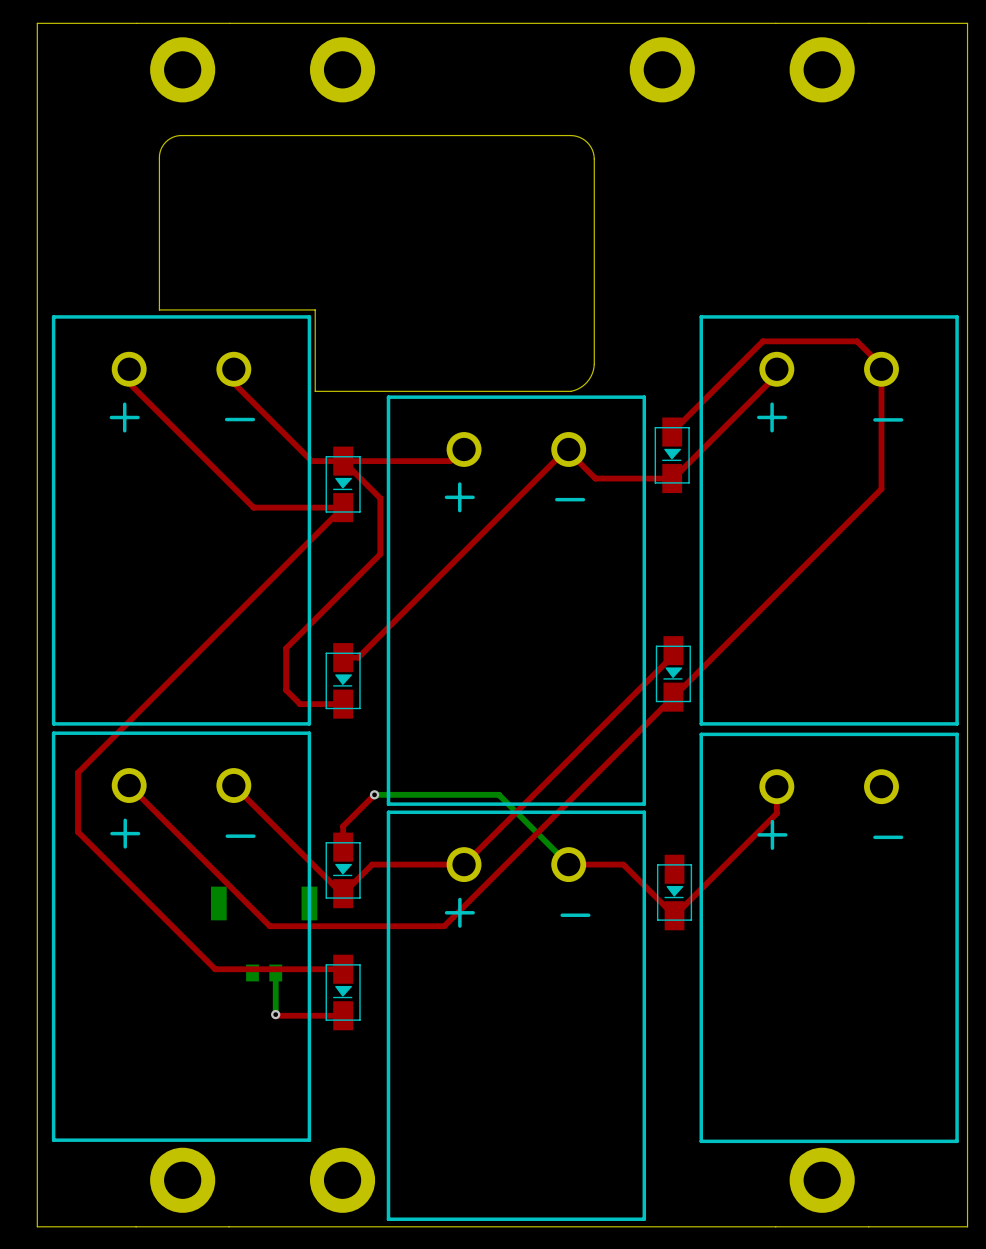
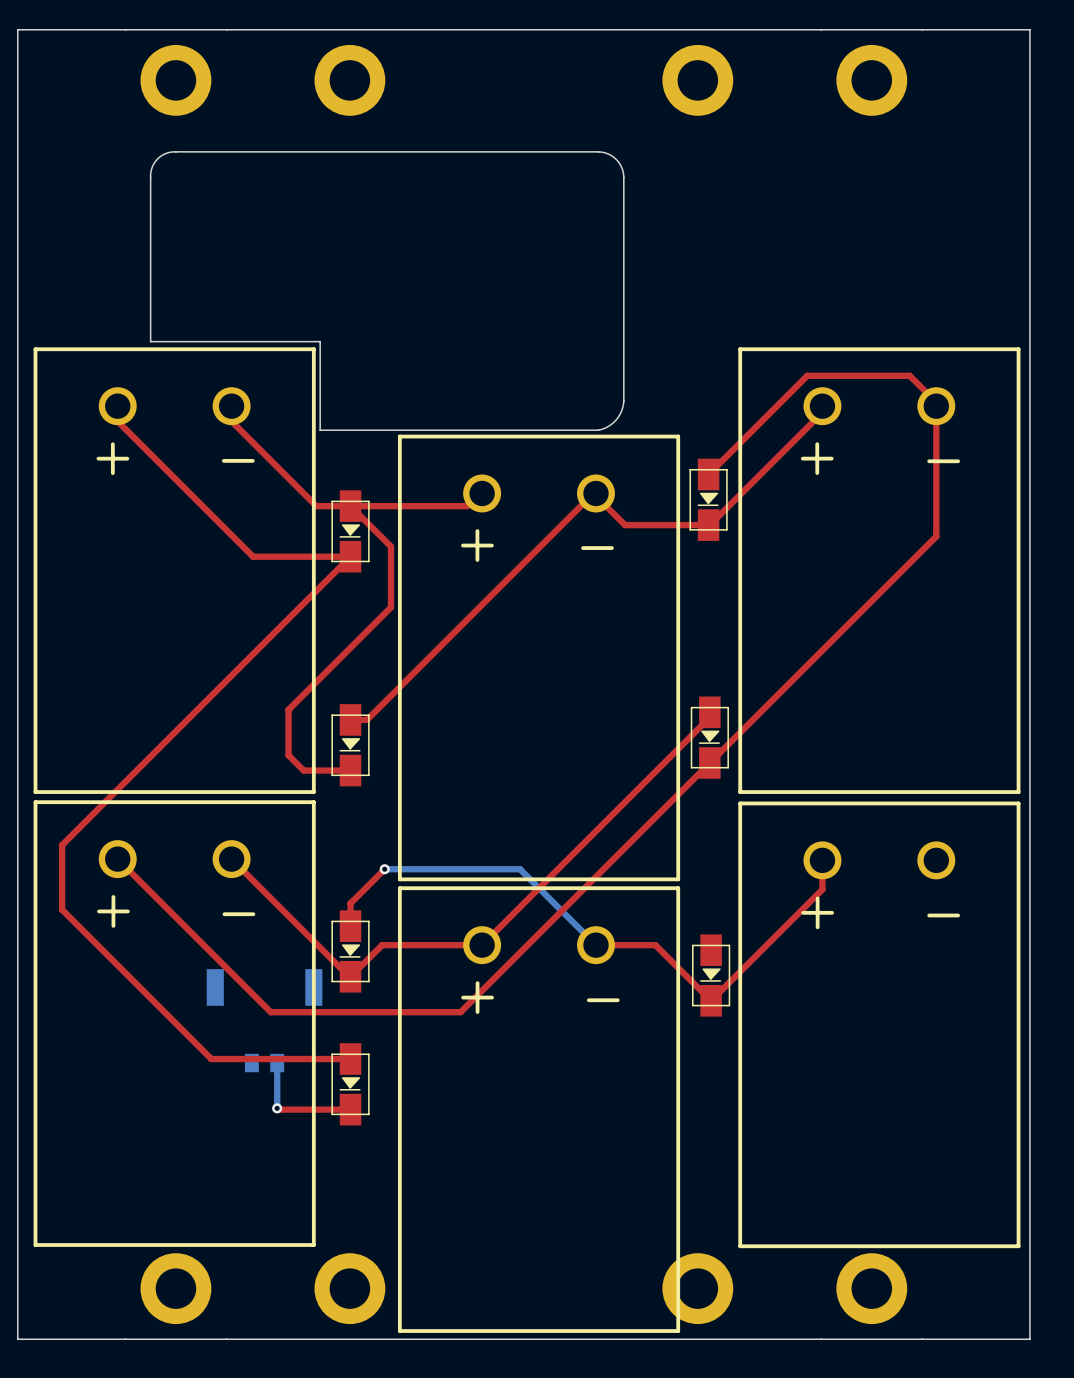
part: none -> (697, 1288)

